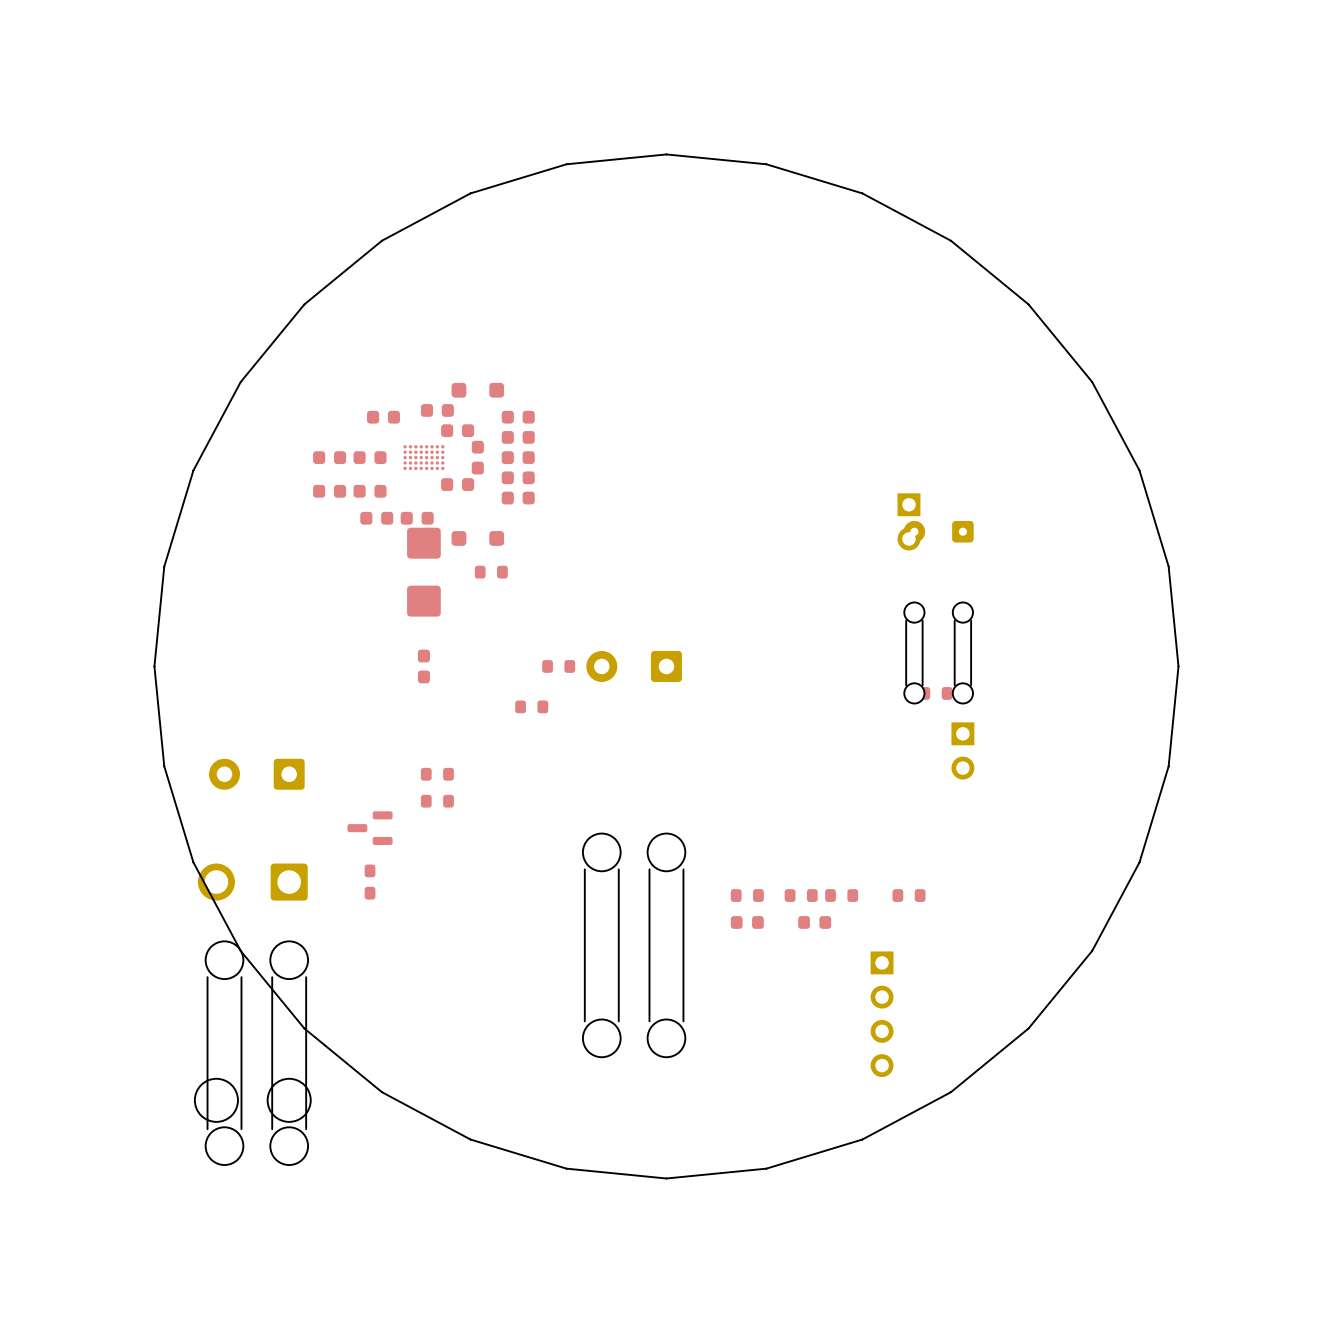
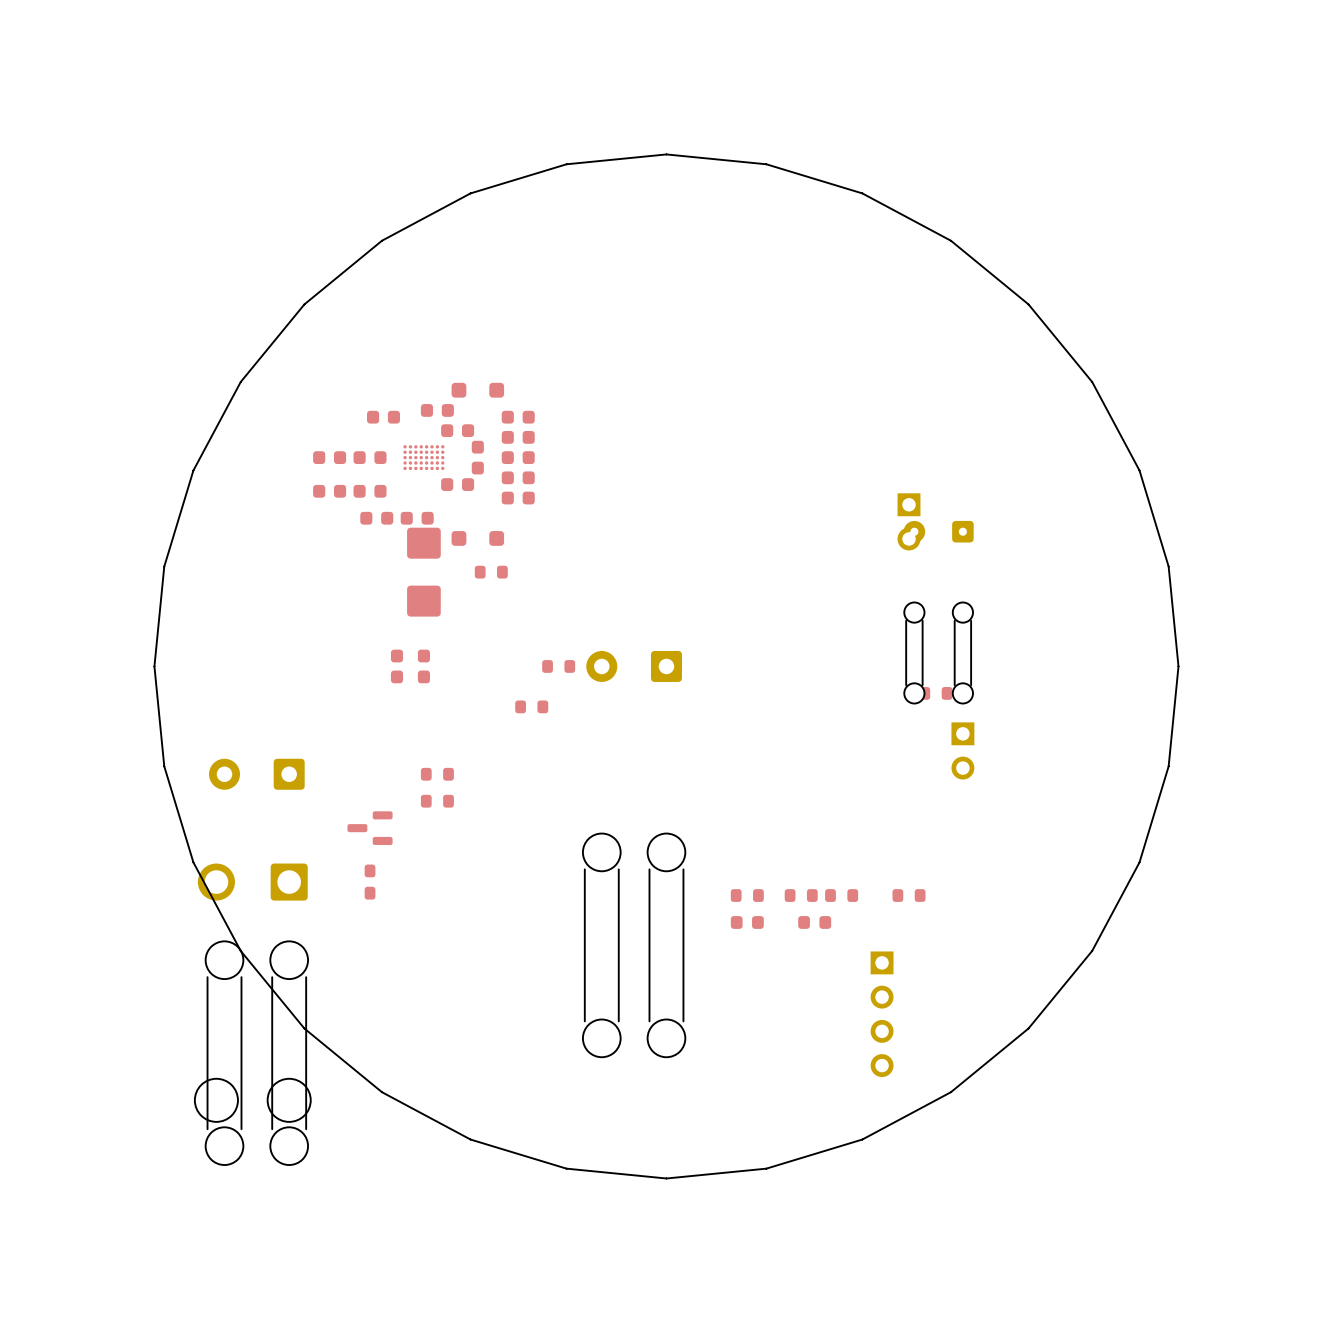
part: none -> (396, 666)

